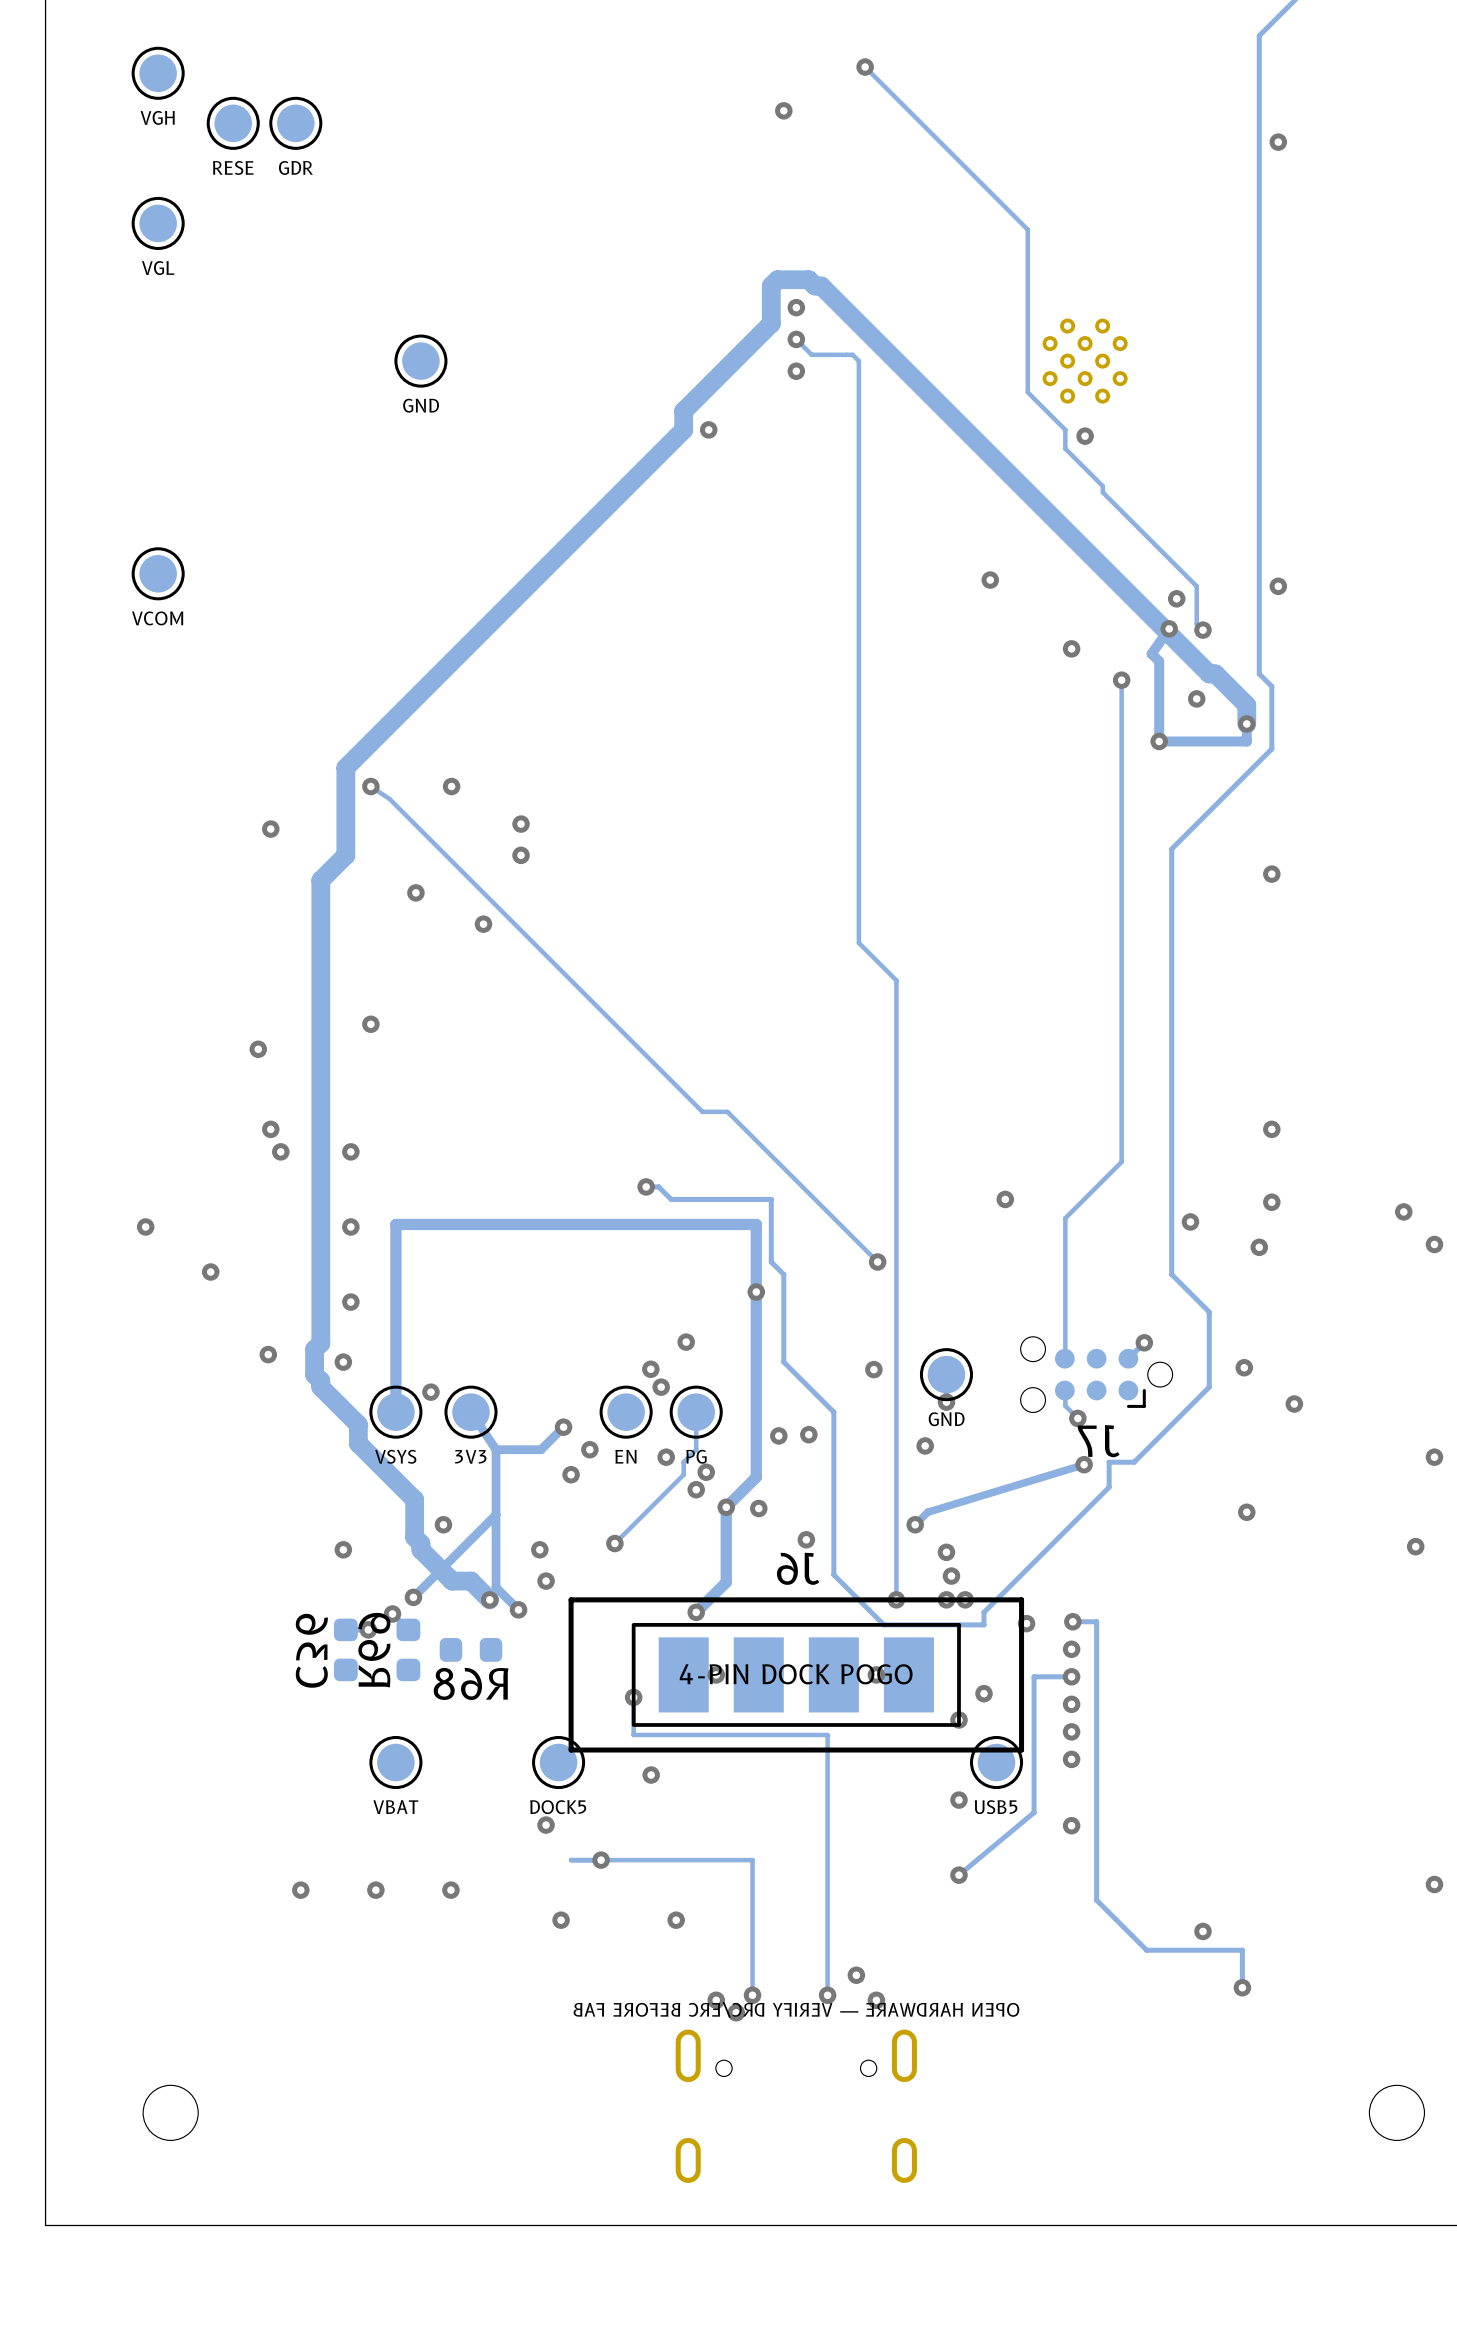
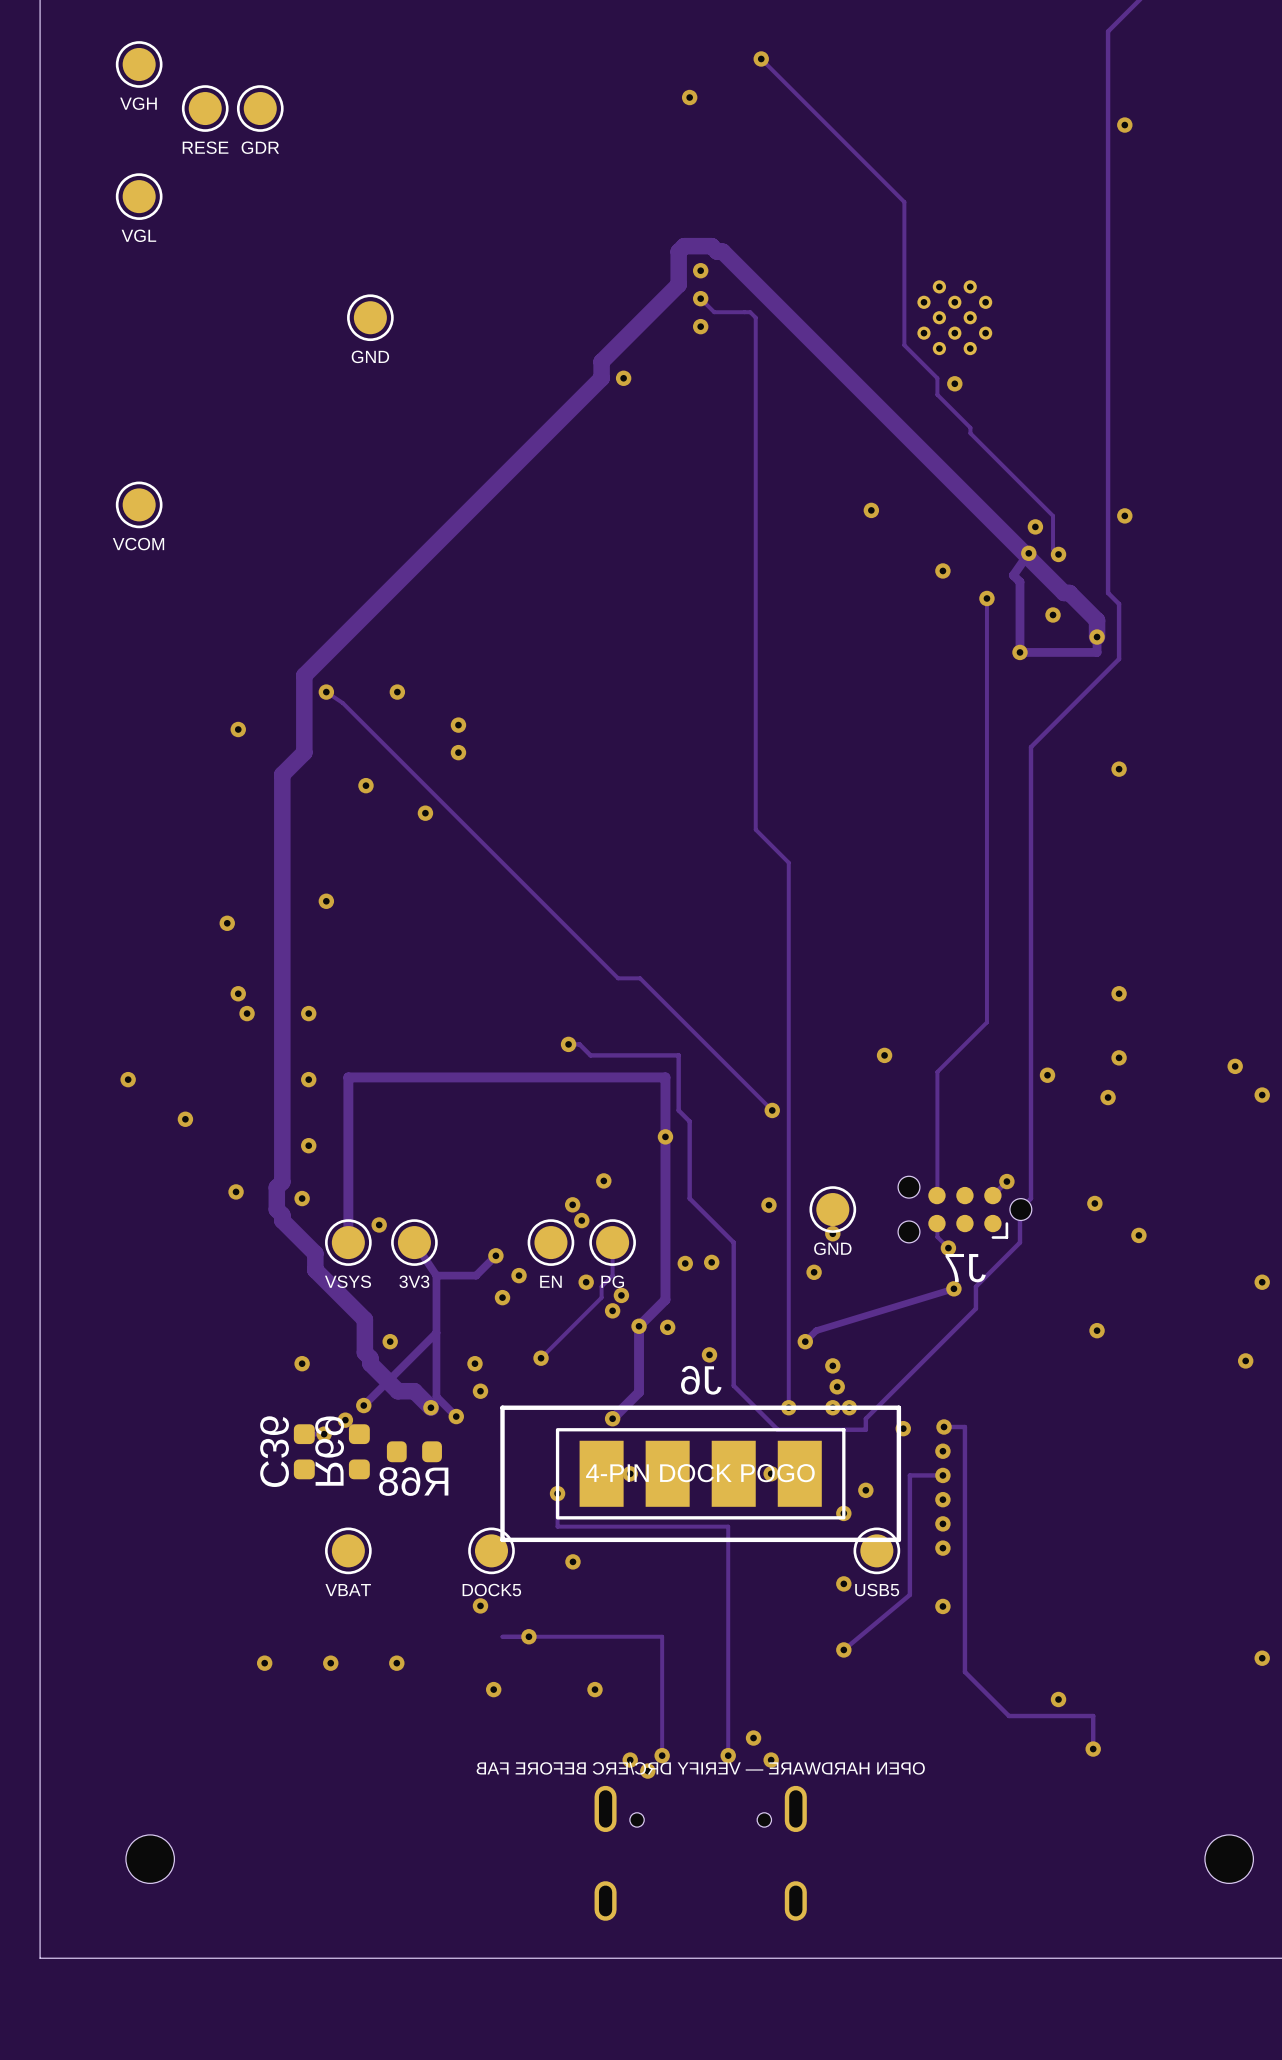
track: (1171, 1274) (1209, 1312) (1209, 1387) (1134, 1462) (1109, 1462) -> (1031, 1121) (1031, 1198) (1019, 1209) (1019, 1242) (975, 1286)

